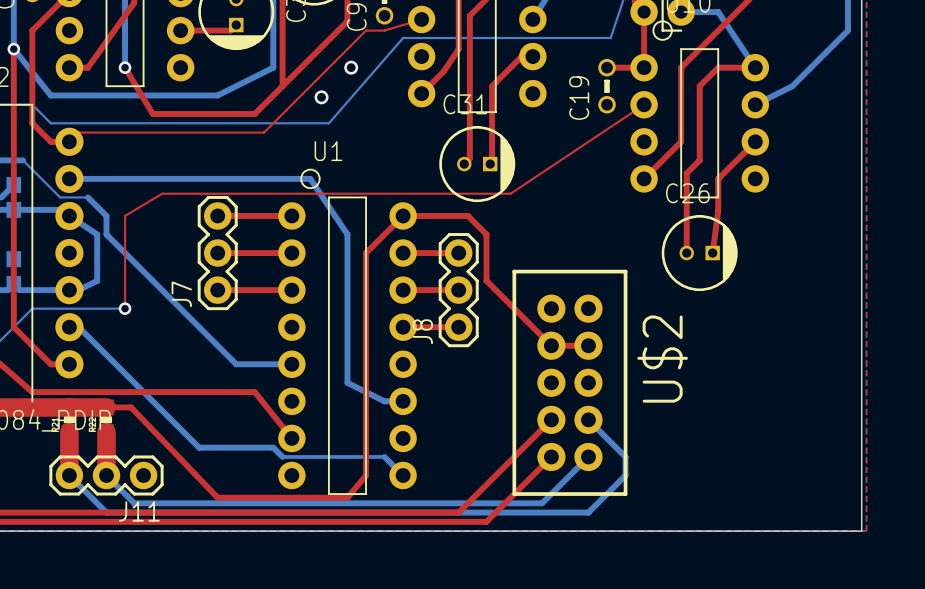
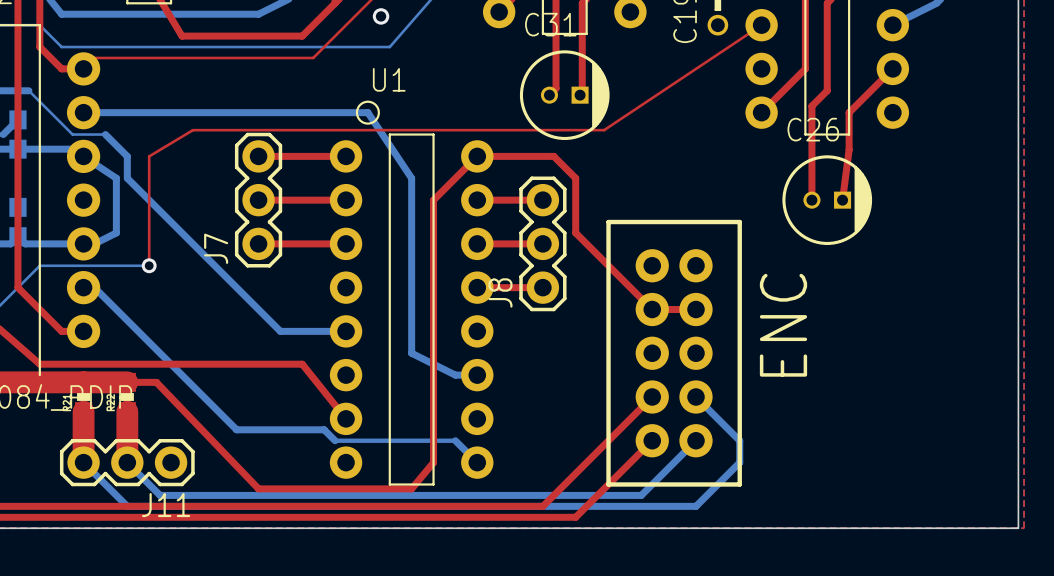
U$2 name: U$2 (662, 359) -> ENC (783, 325)

